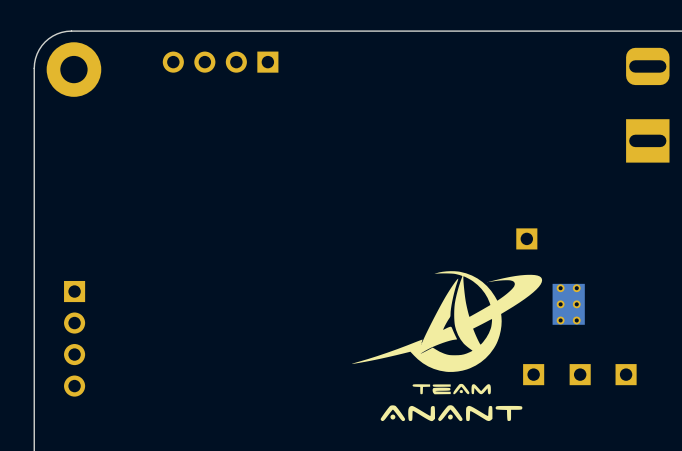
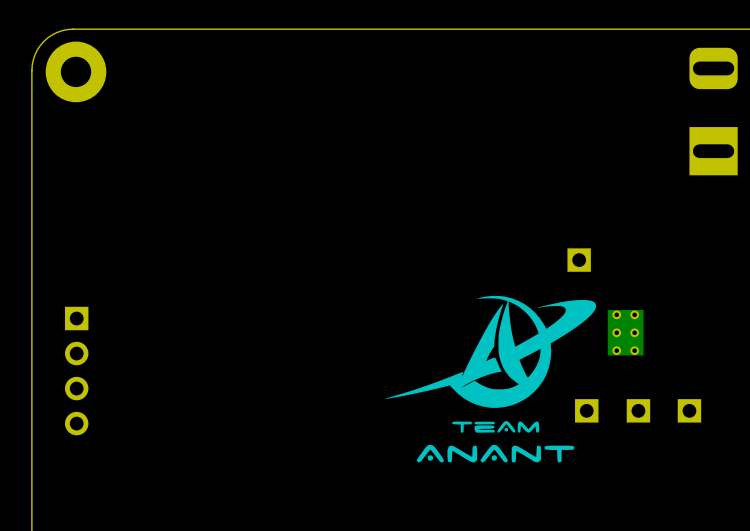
part: (220, 62) -> none

